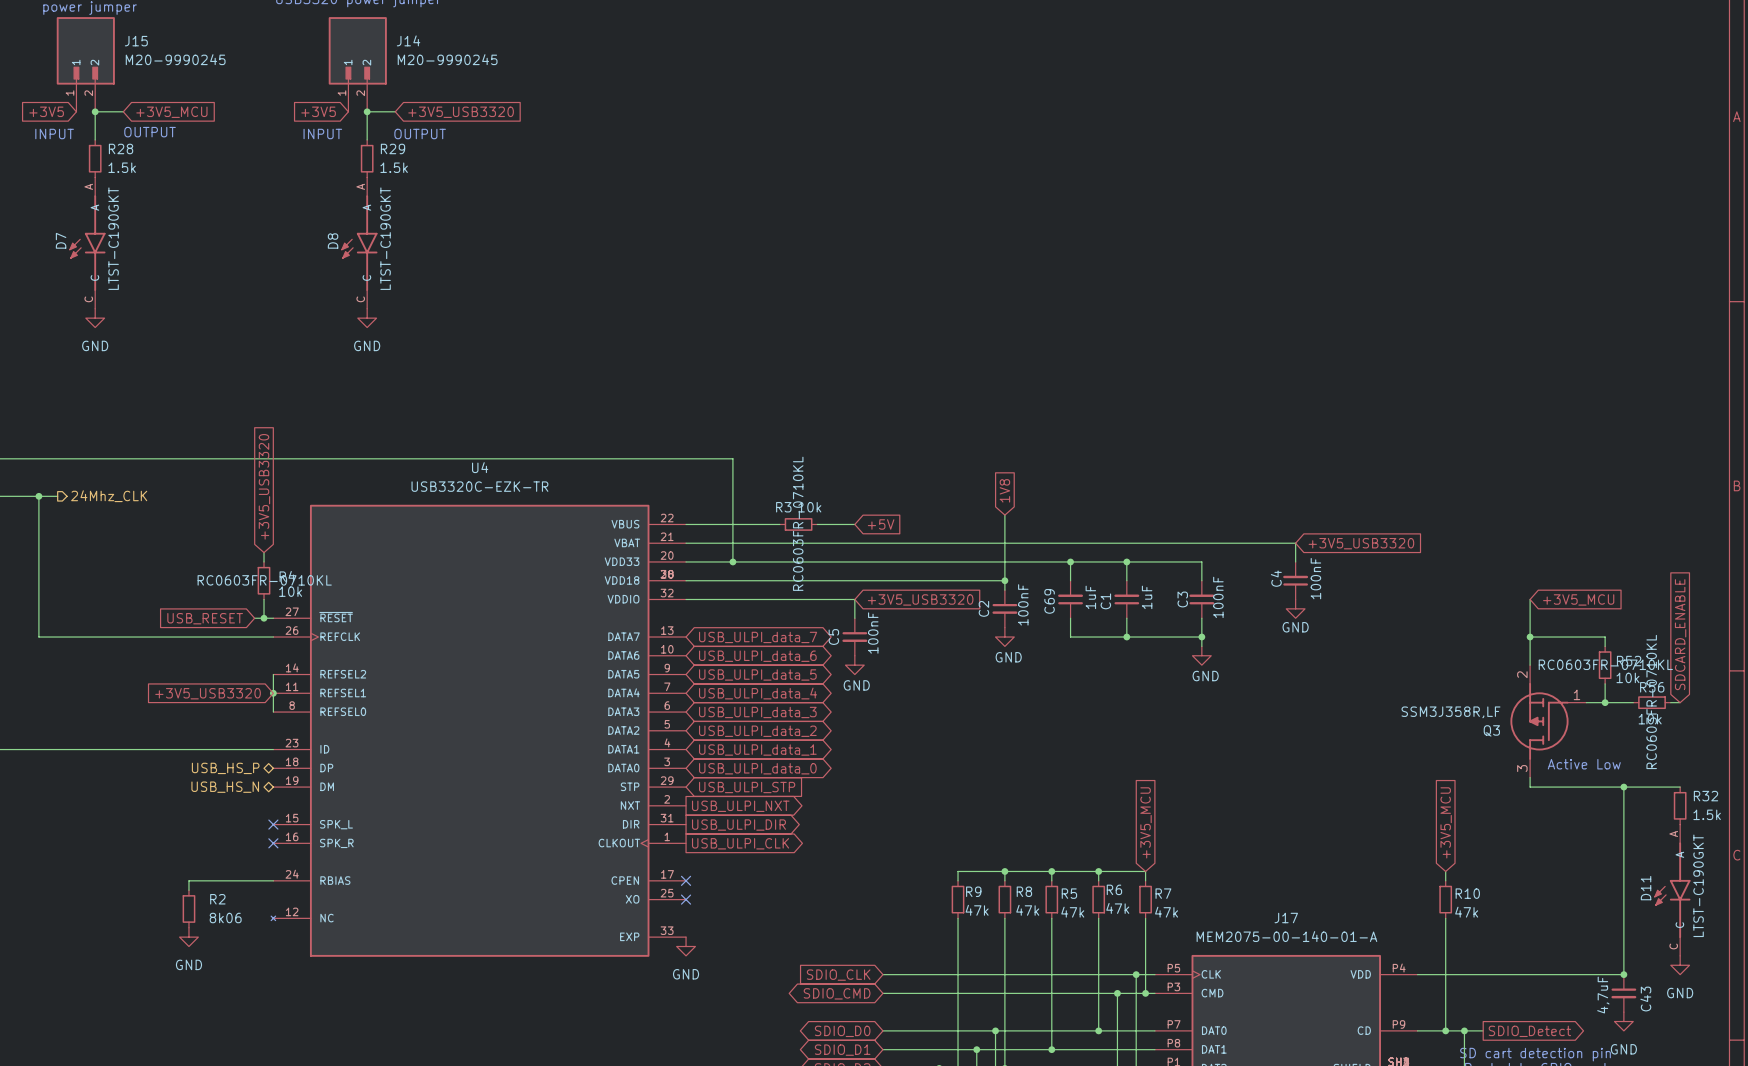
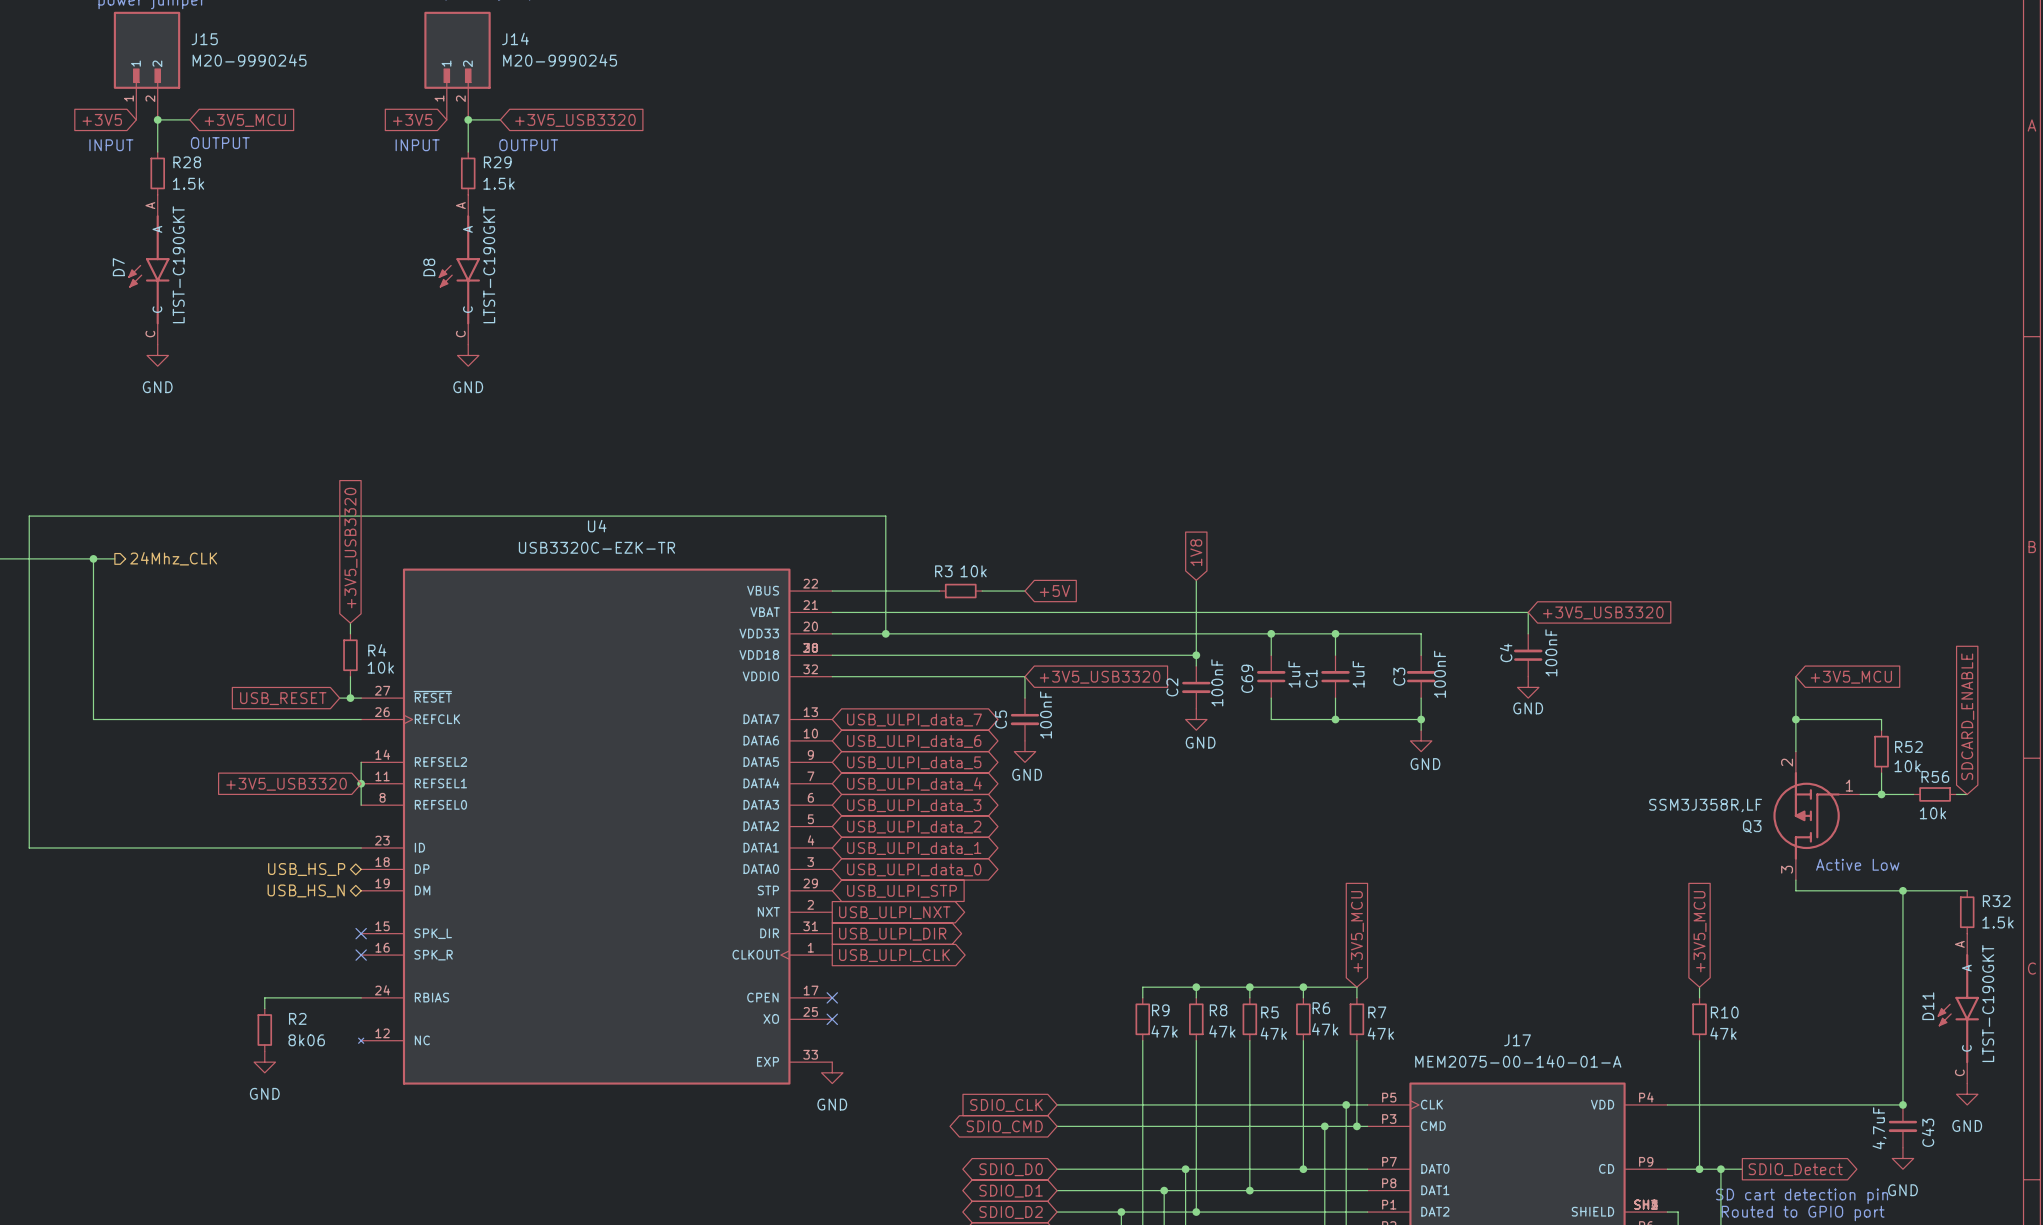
R3 text: RC0603FR-0710KL (798, 523) -> none
R4 text: RC0603FR-0710KL (264, 580) -> none
R52 text: RC0603FR-0710KL (1605, 664) -> none
R56 text: RC0603FR-0710KL (1651, 701) -> none

